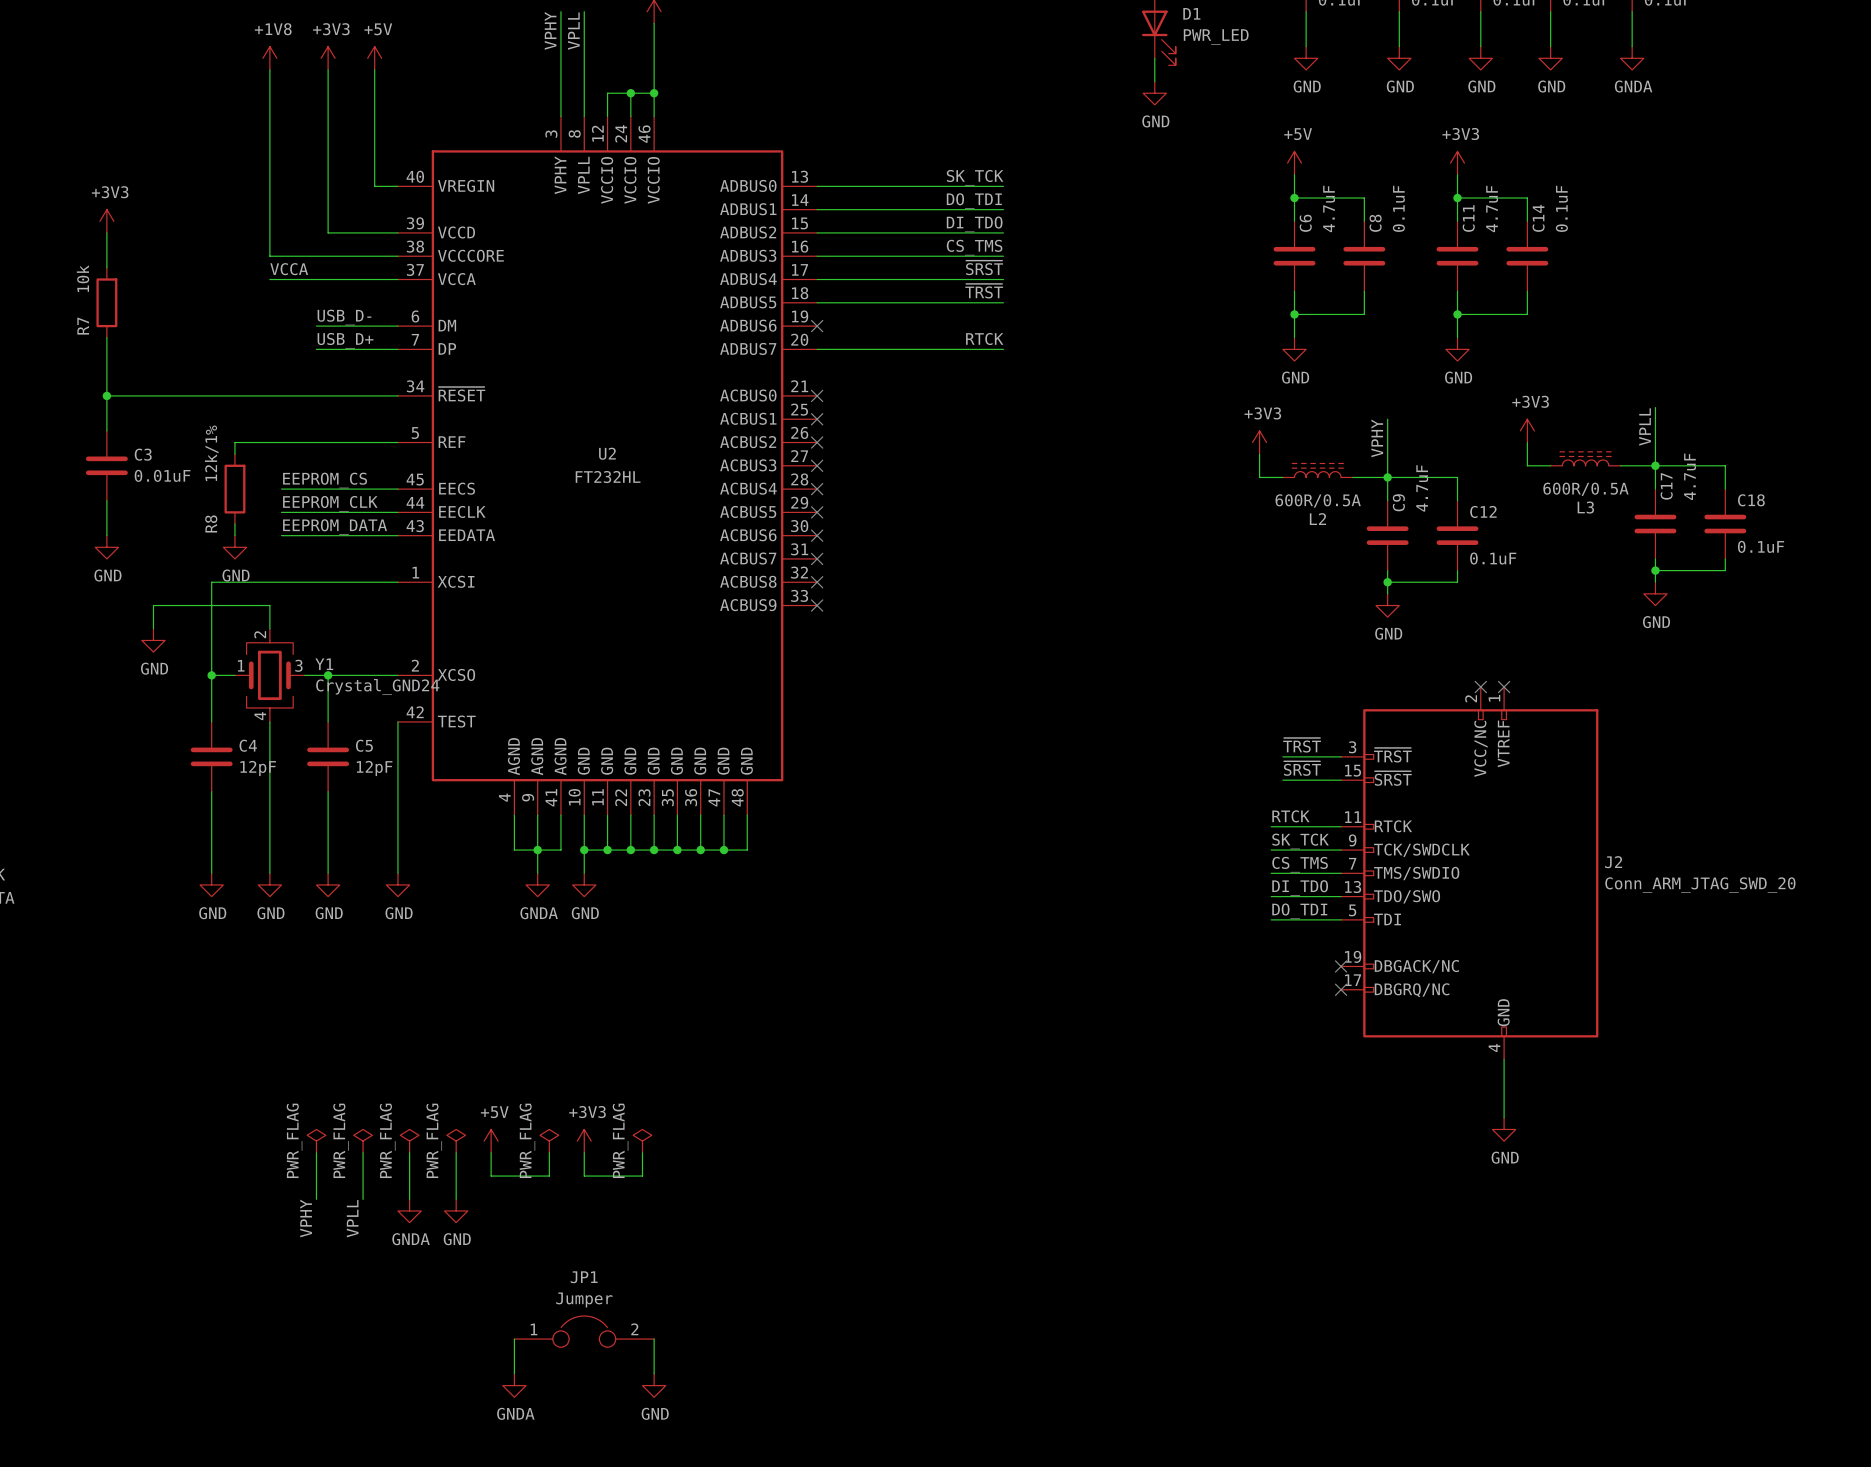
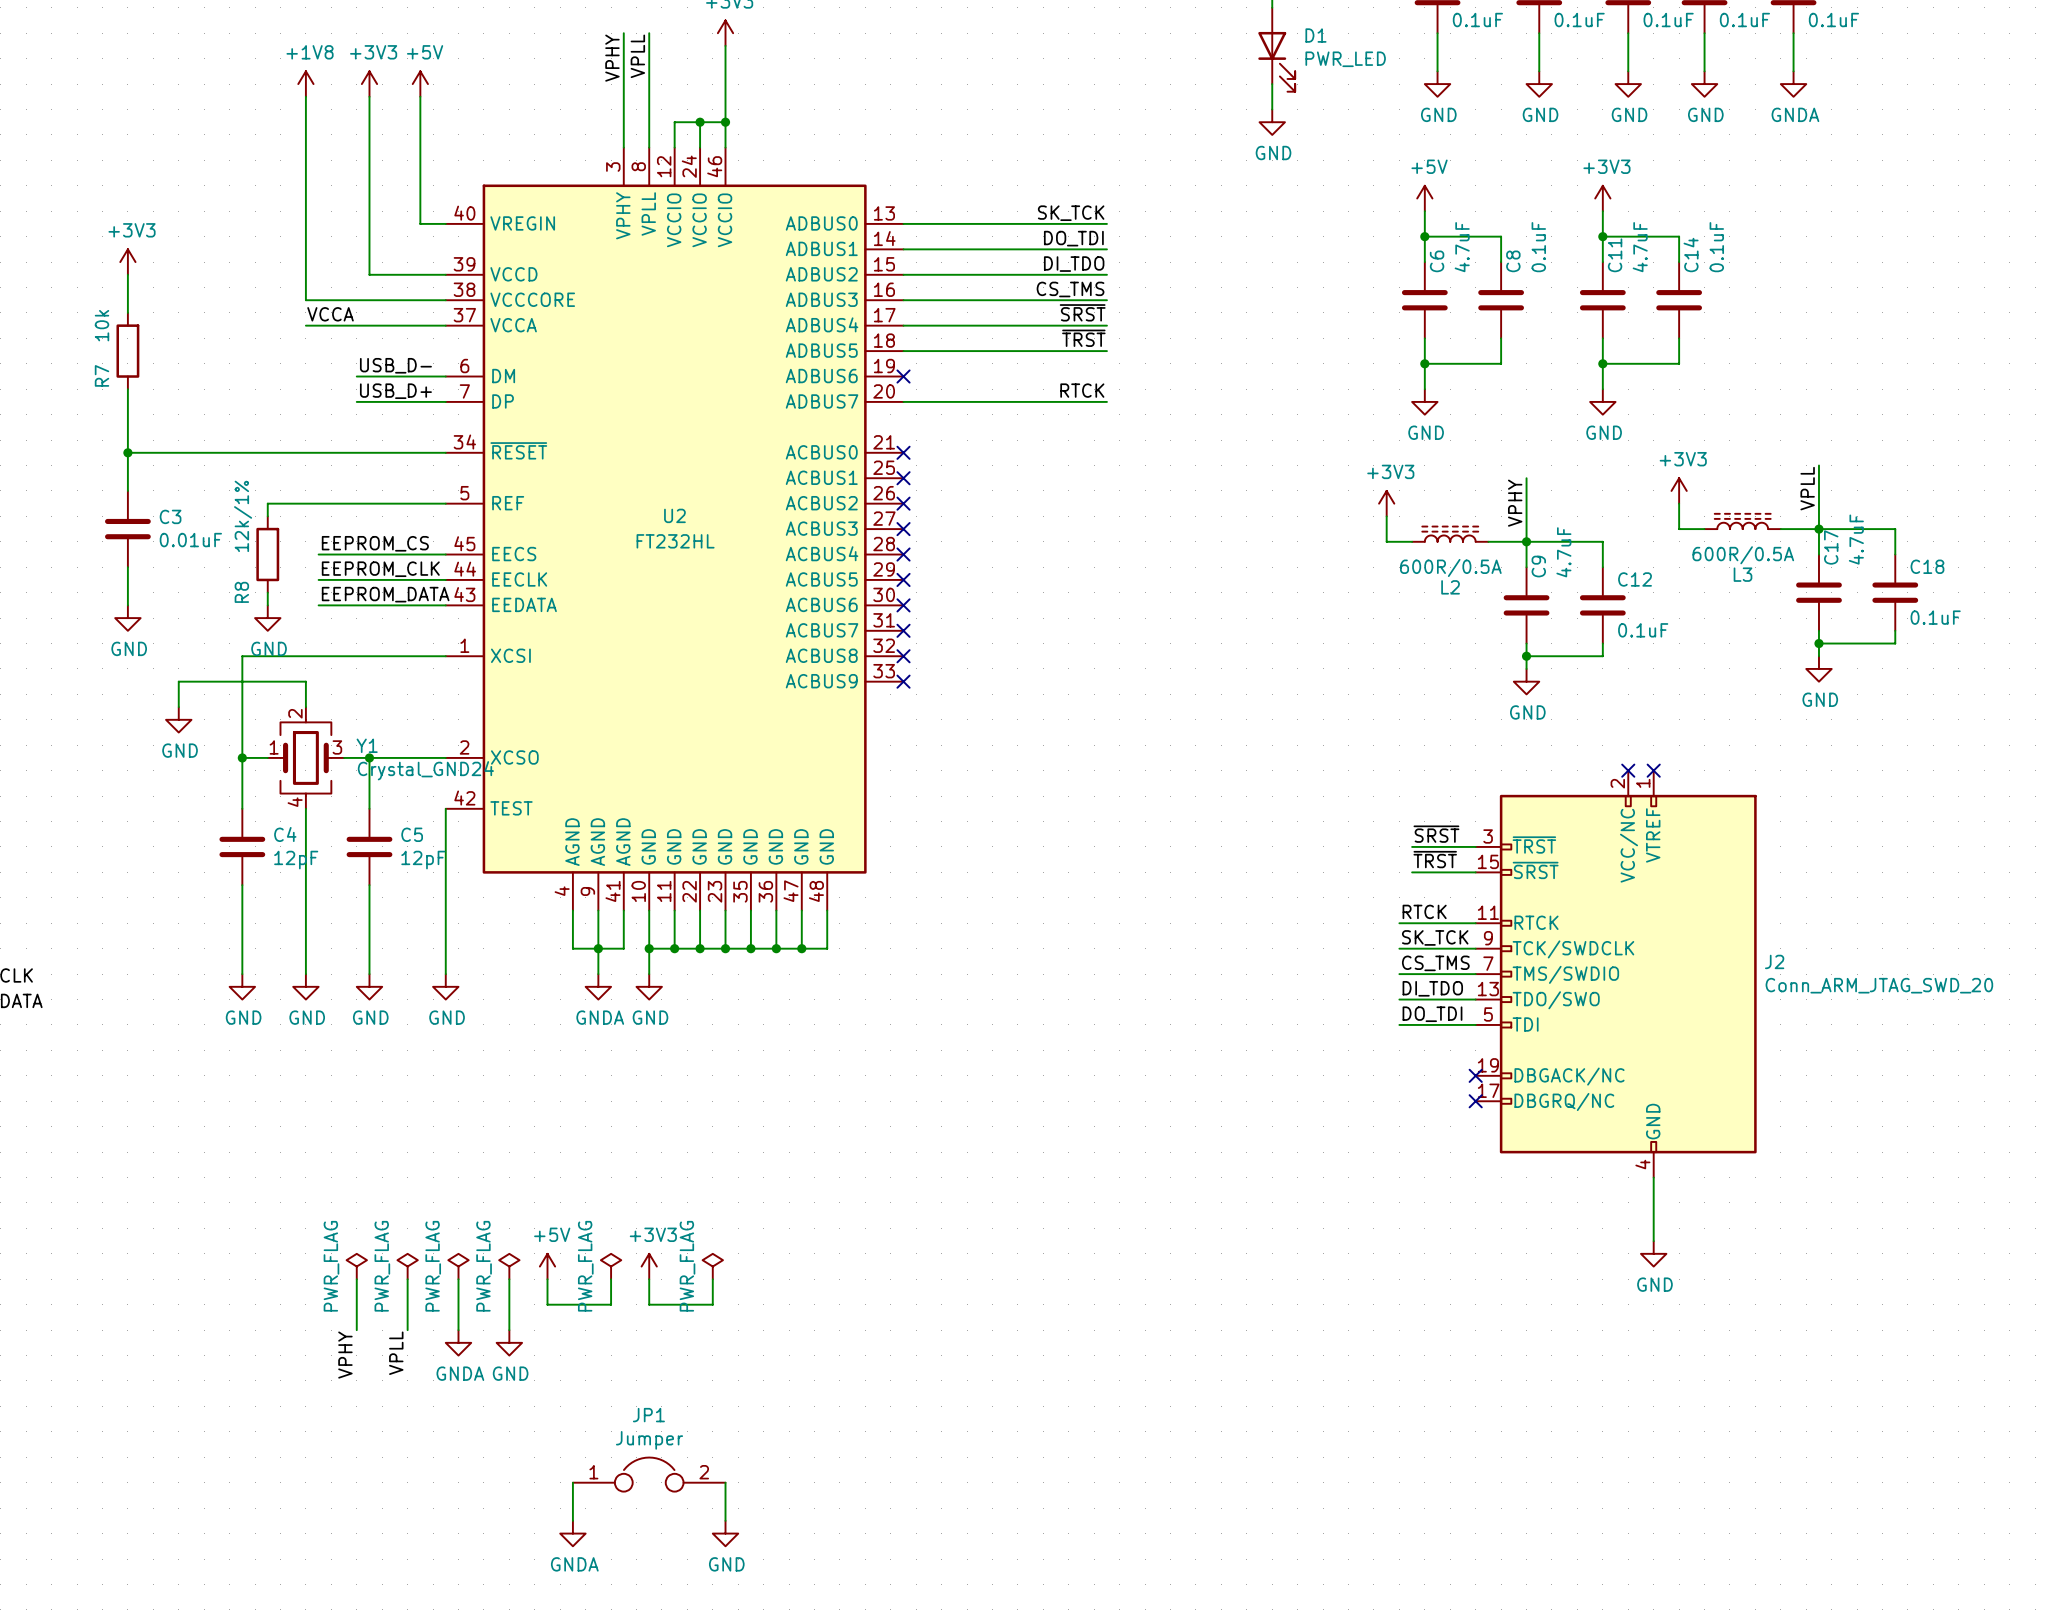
label: ~{TRST} (1302, 745) -> ~{SRST} (1436, 834)
label: ~{SRST} (1302, 768) -> ~{TRST} (1435, 859)

